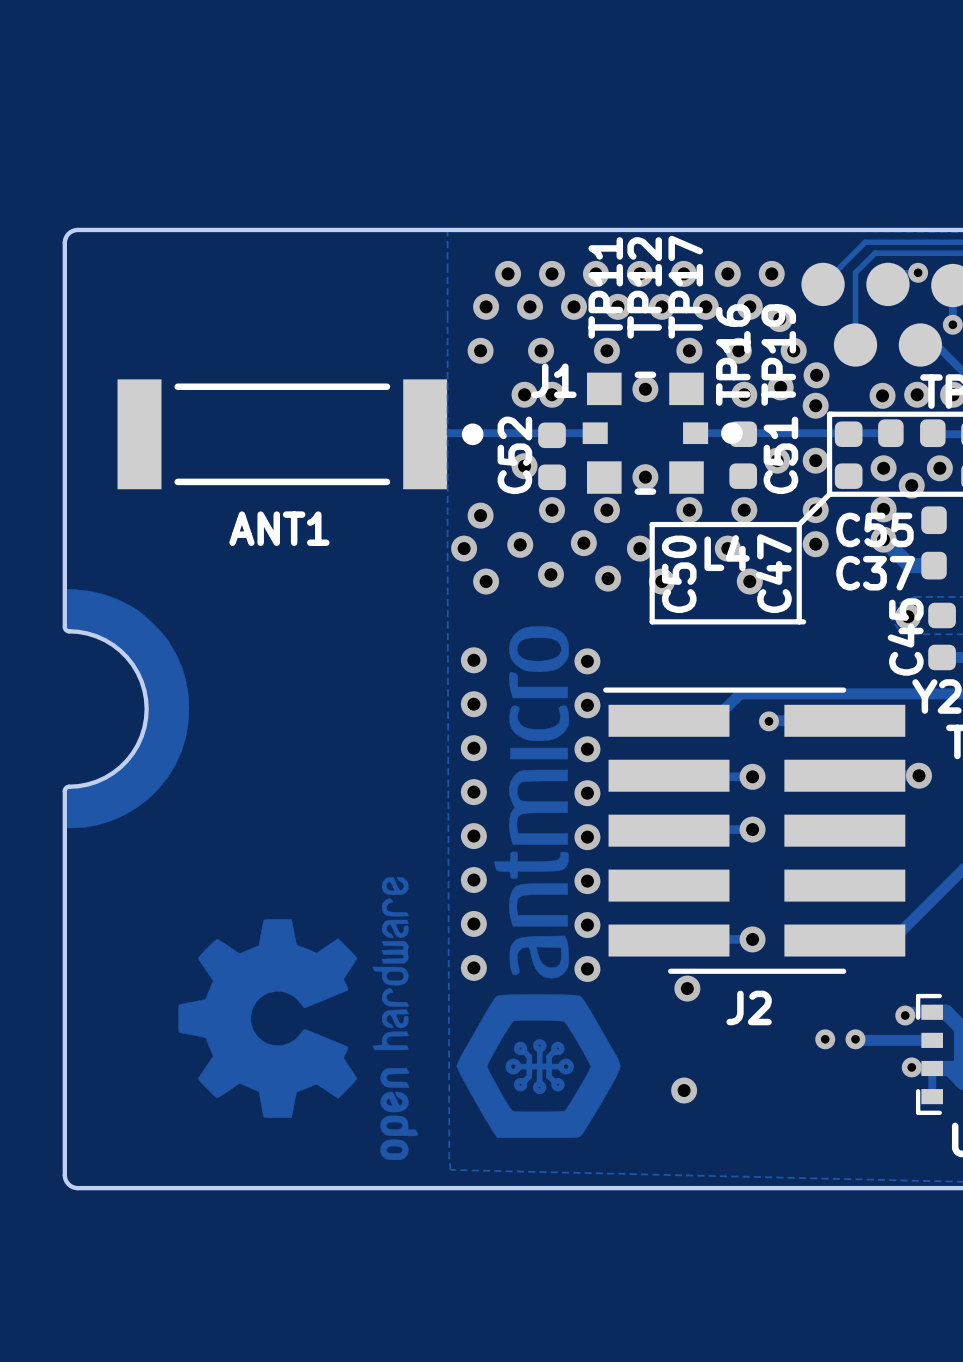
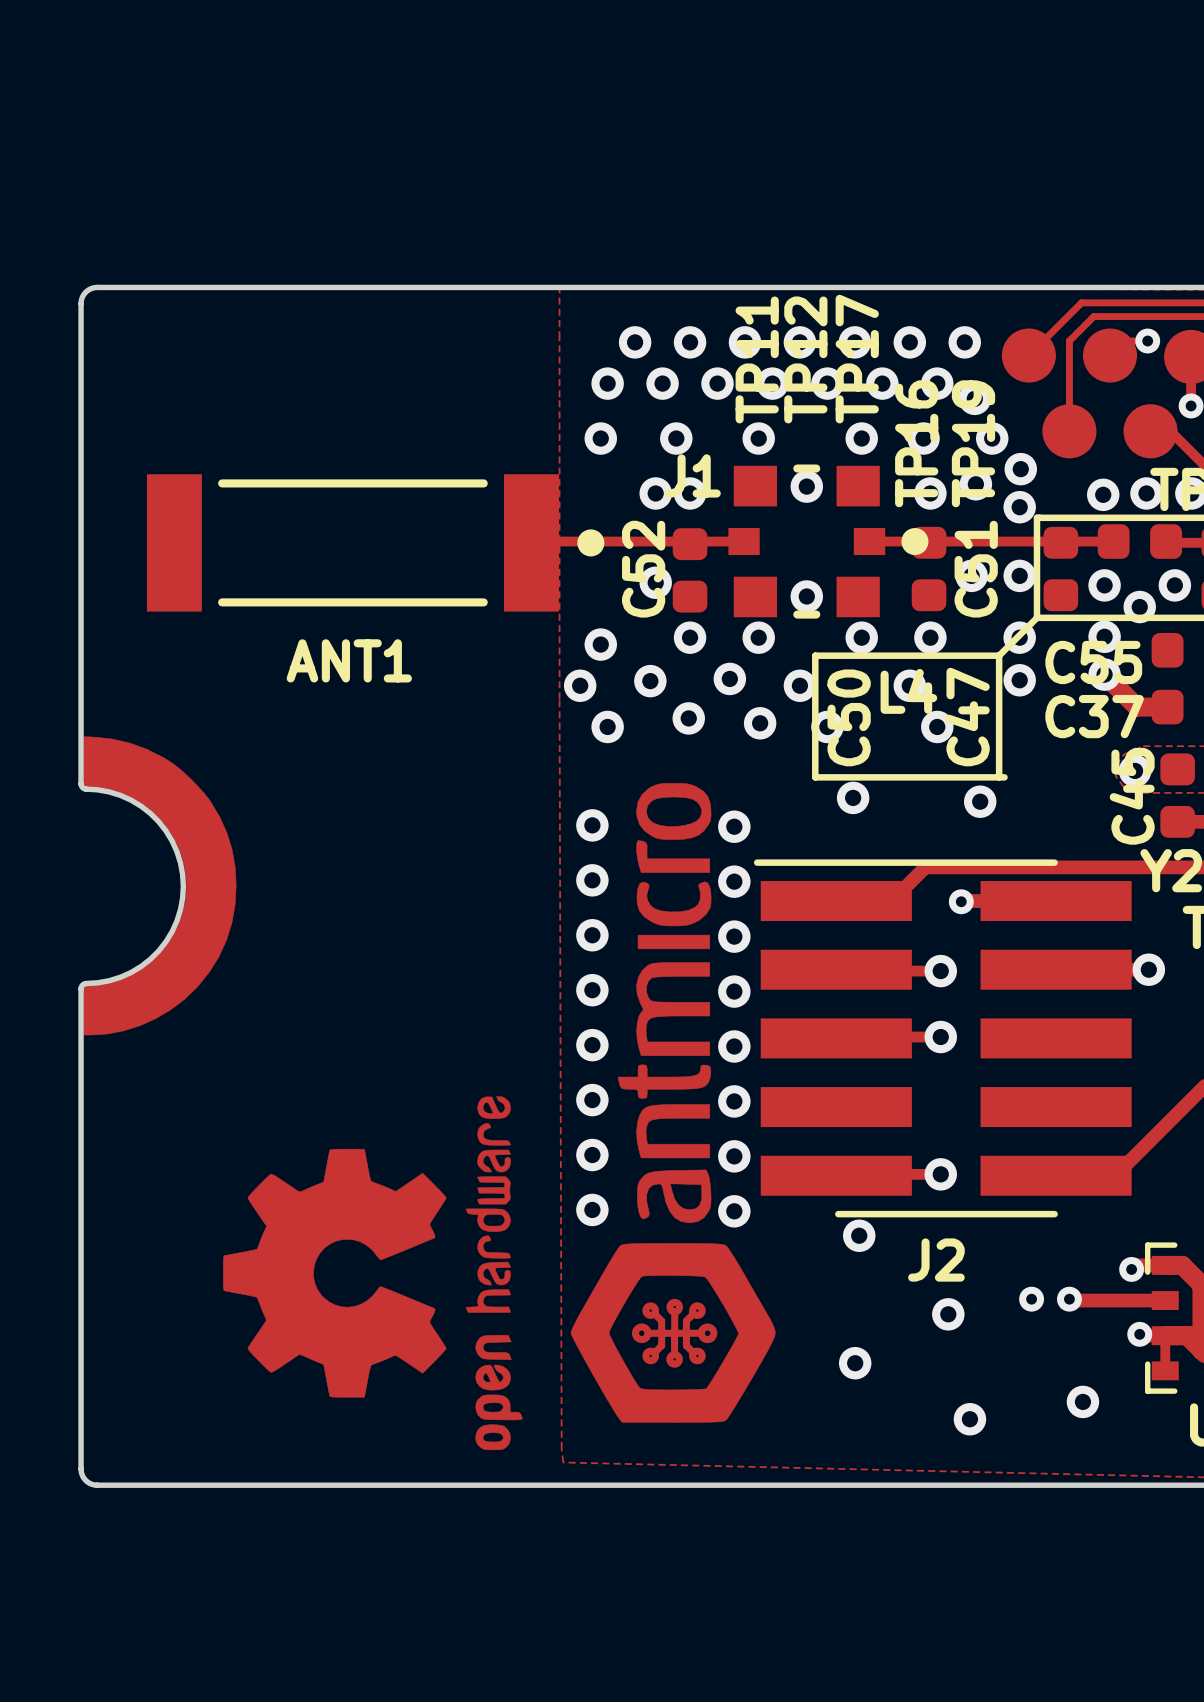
via: none -> (853, 797)
via: none -> (980, 801)
via: none -> (948, 1314)
via: none -> (1082, 1401)
via: none -> (969, 1419)

